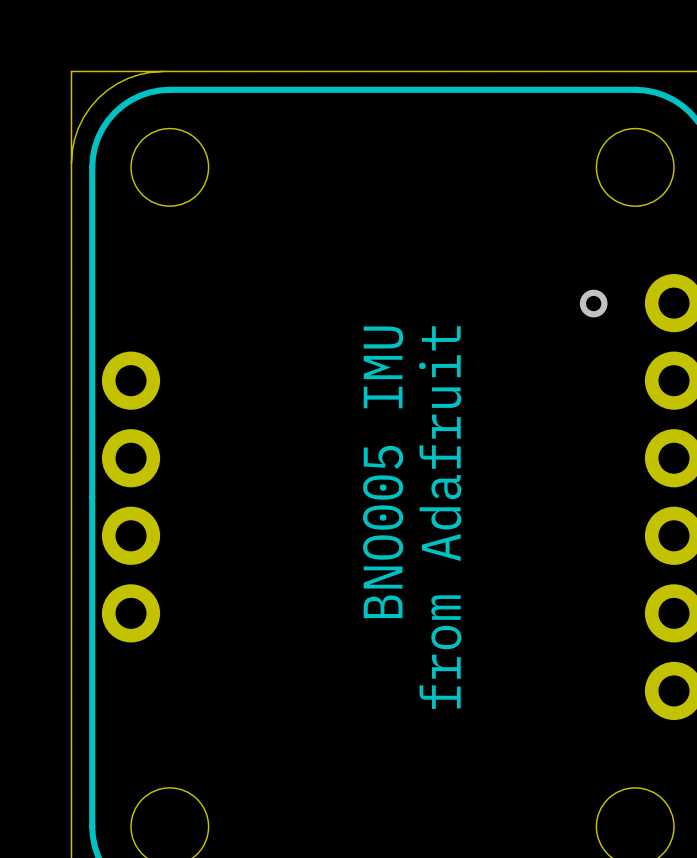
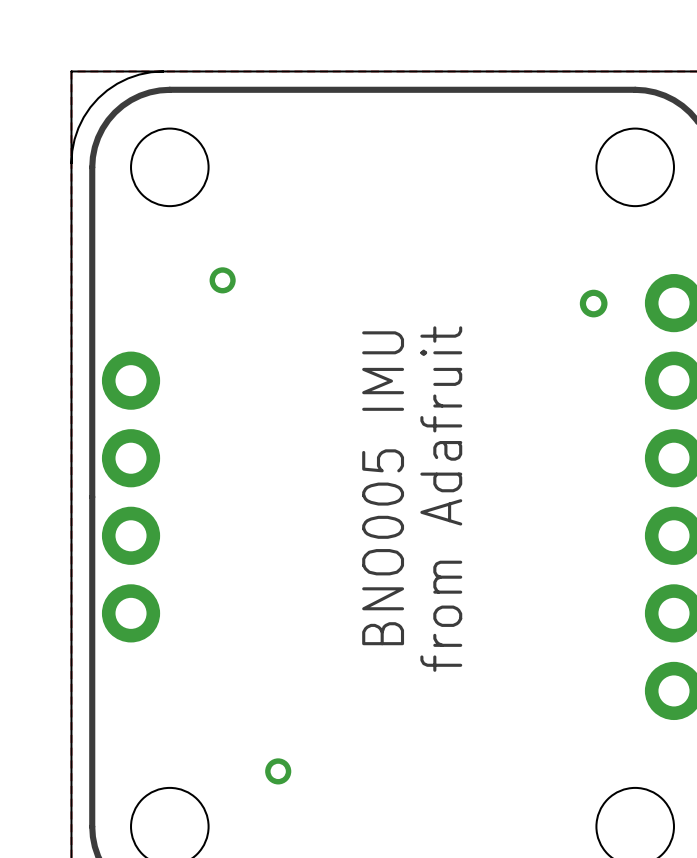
via: none -> (222, 280)
via: none -> (278, 771)

